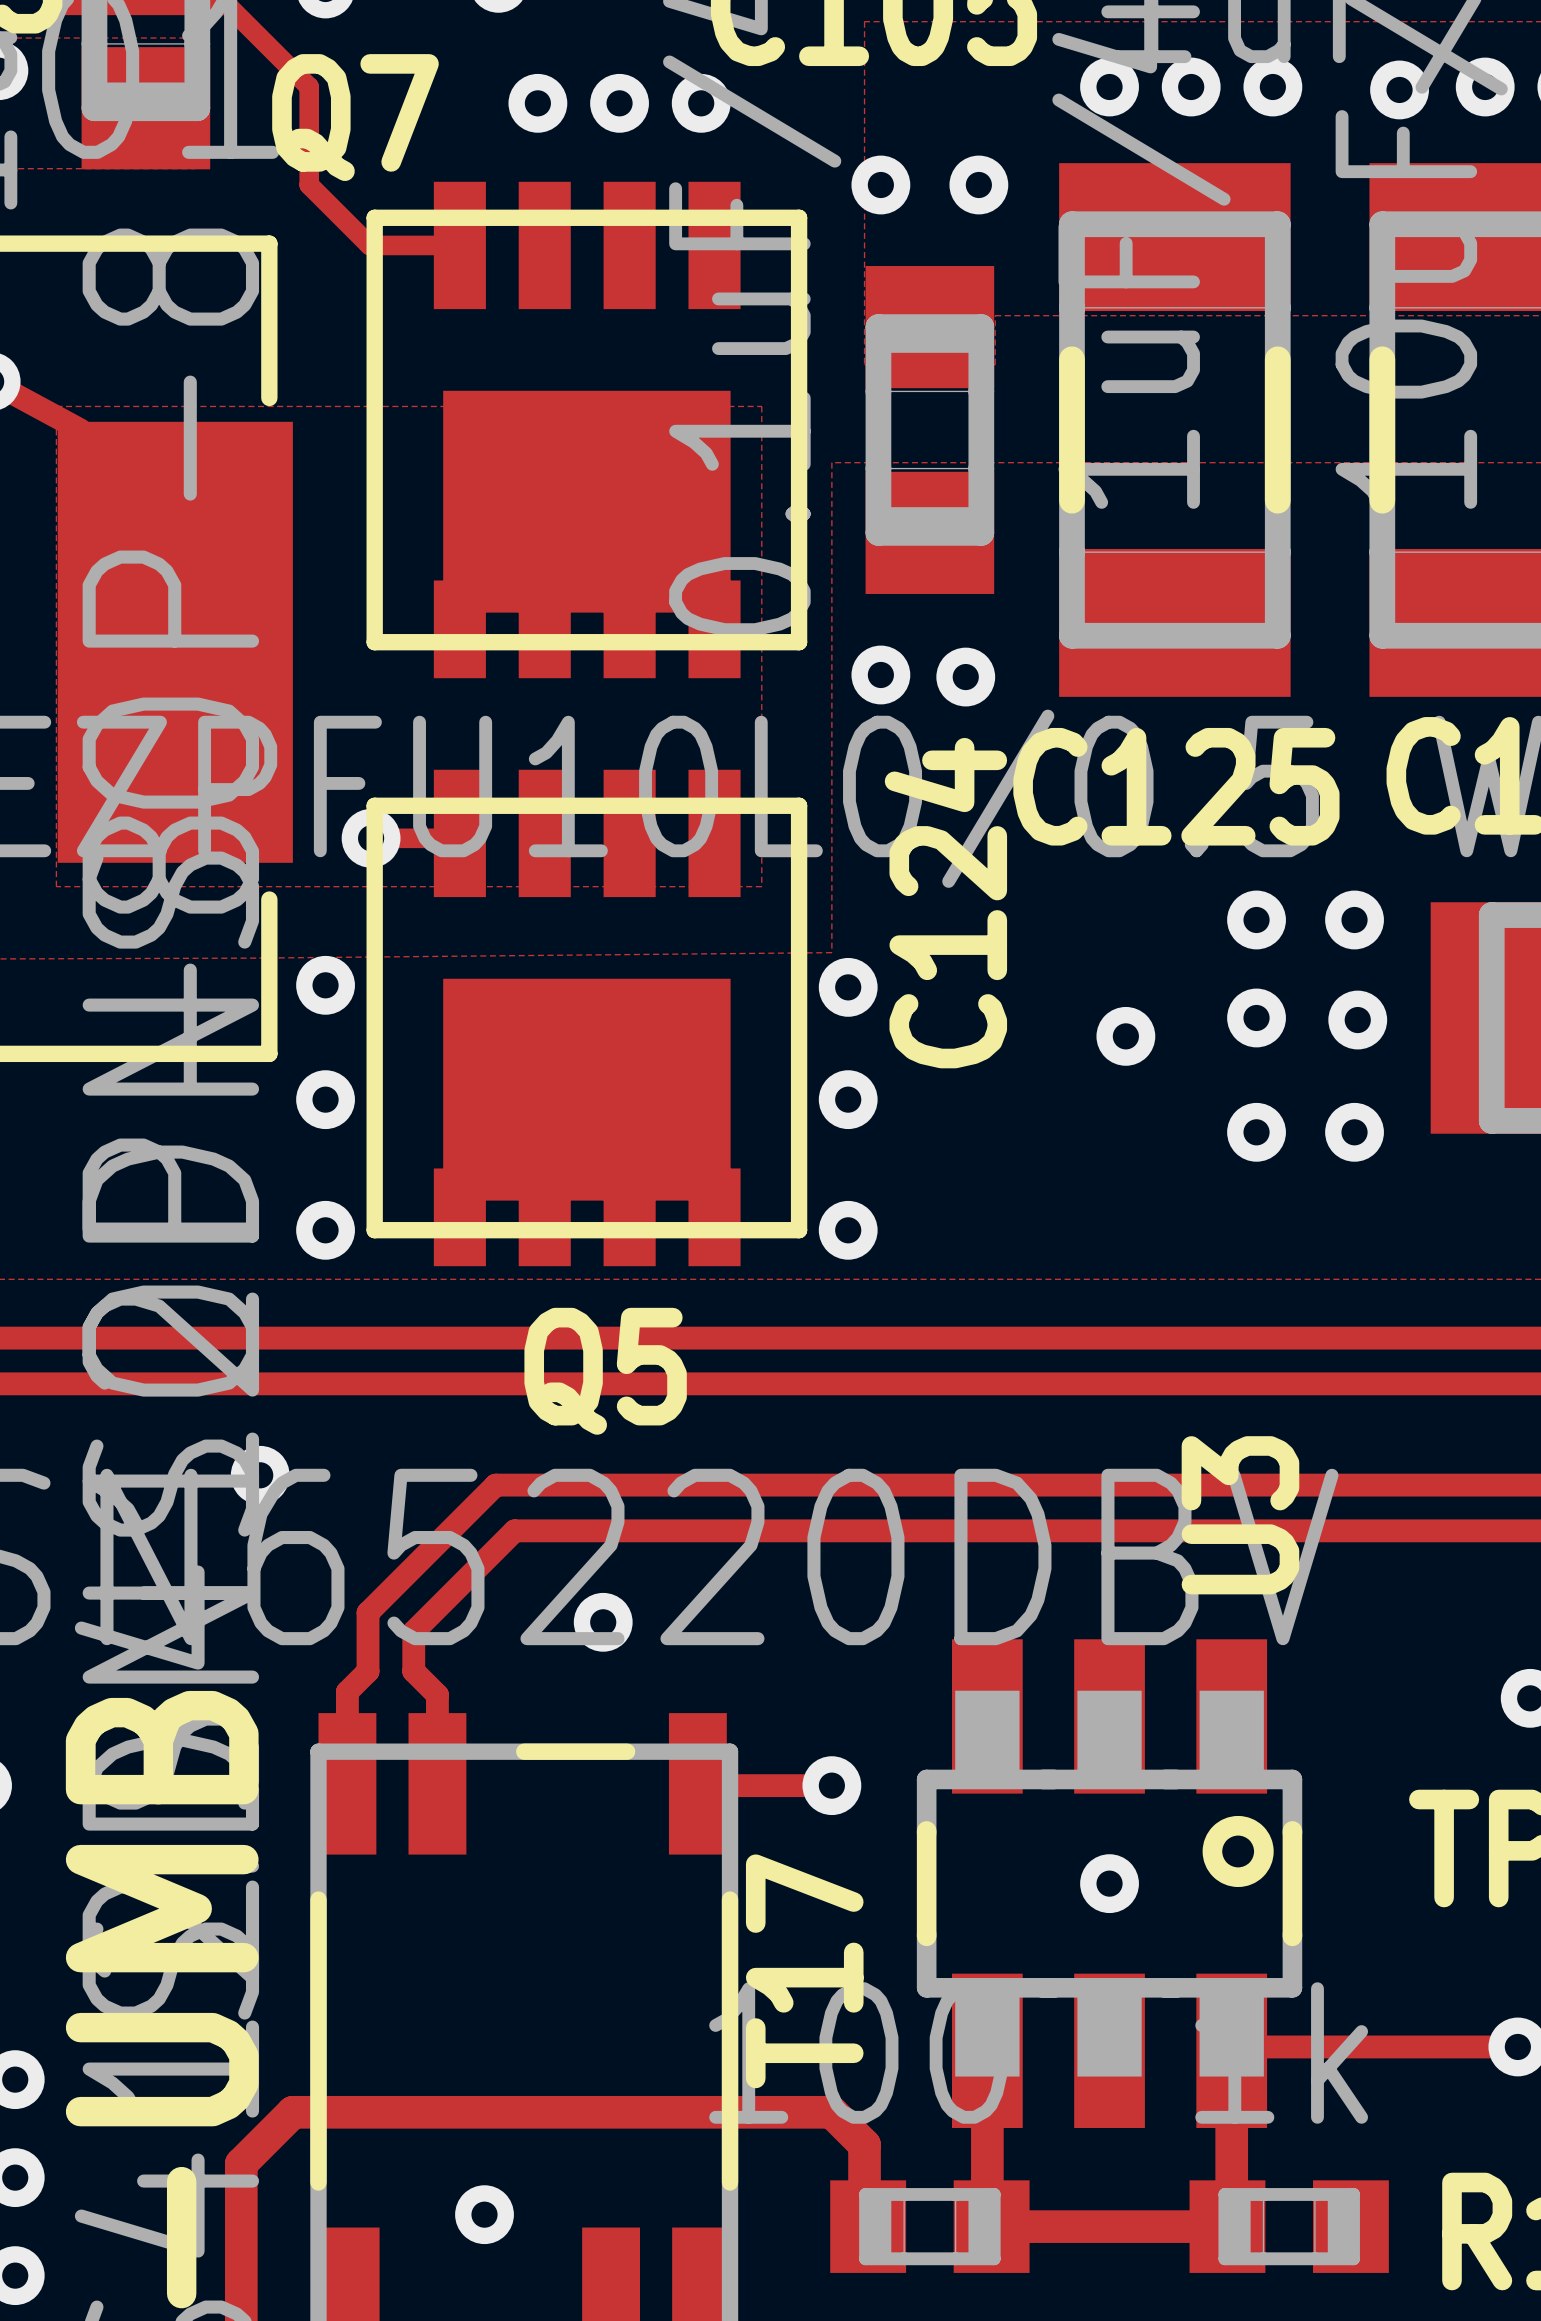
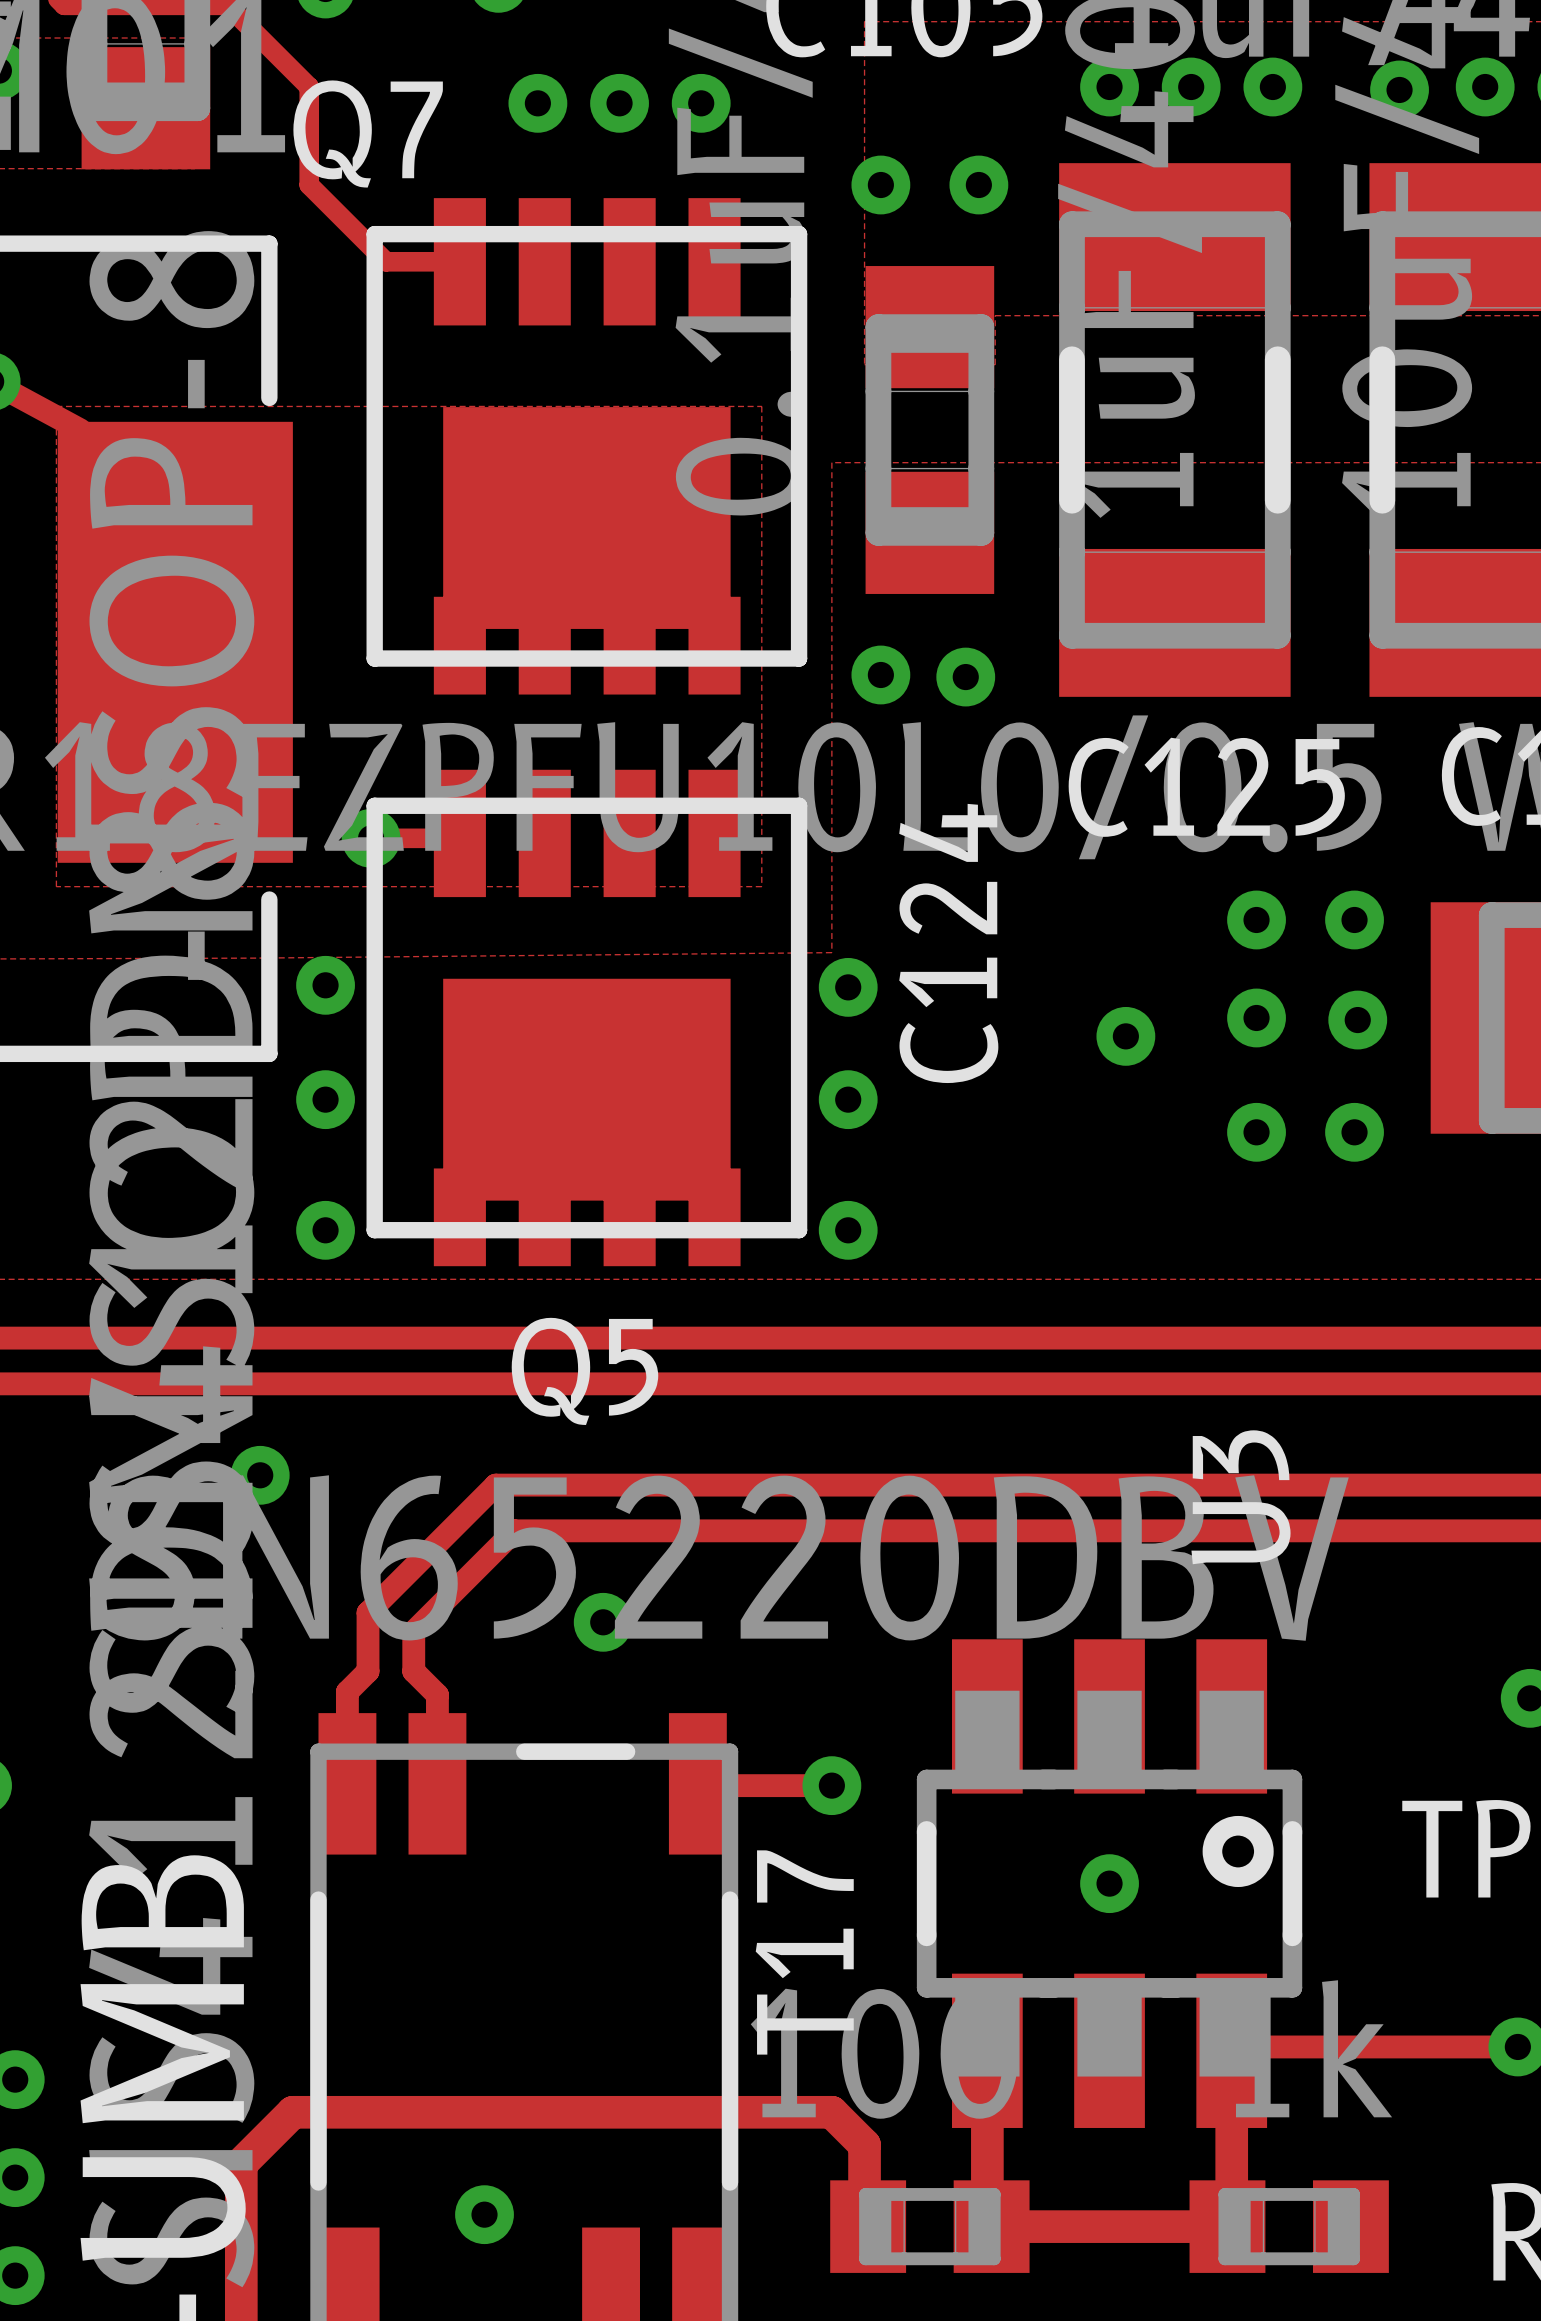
track: (369, 245) (459, 245) -> (369, 245) (386, 261) (459, 261)
Q7 position: (586, 429) -> (586, 446)

